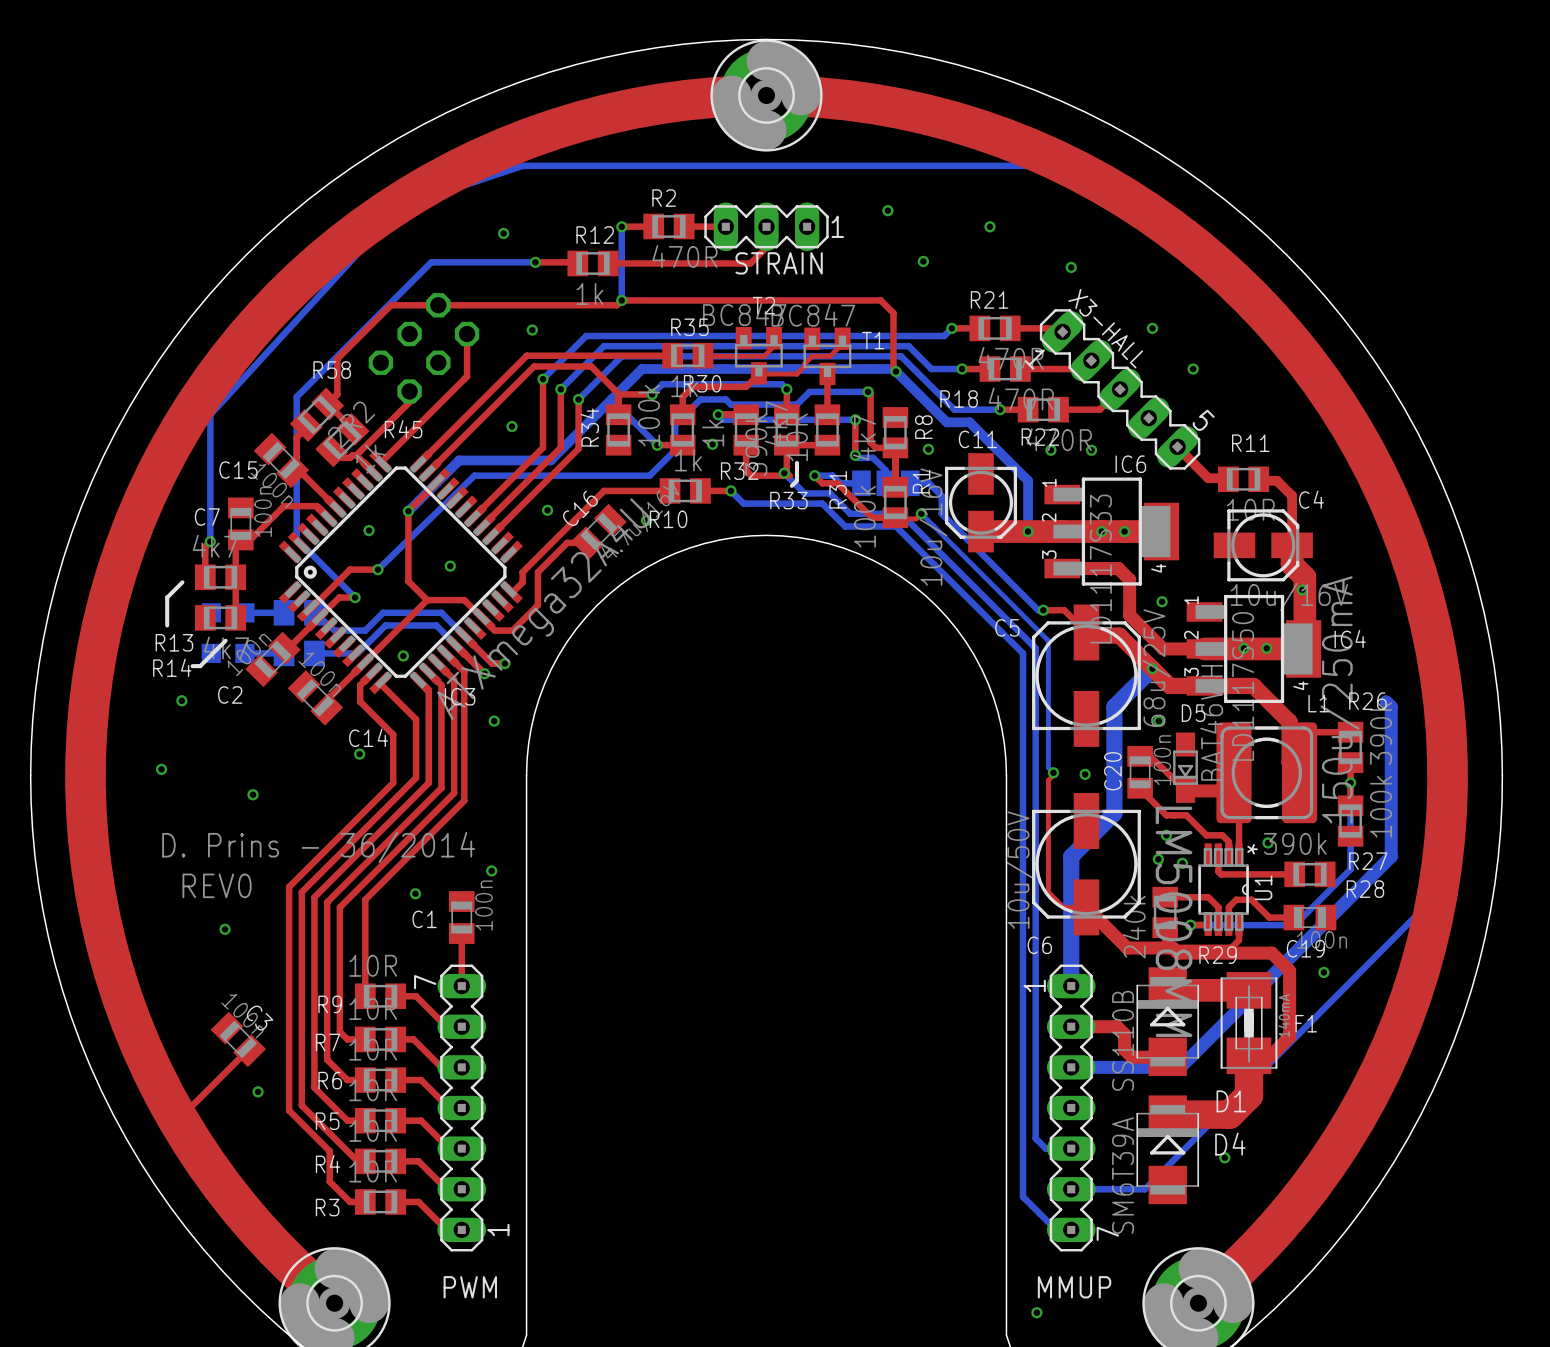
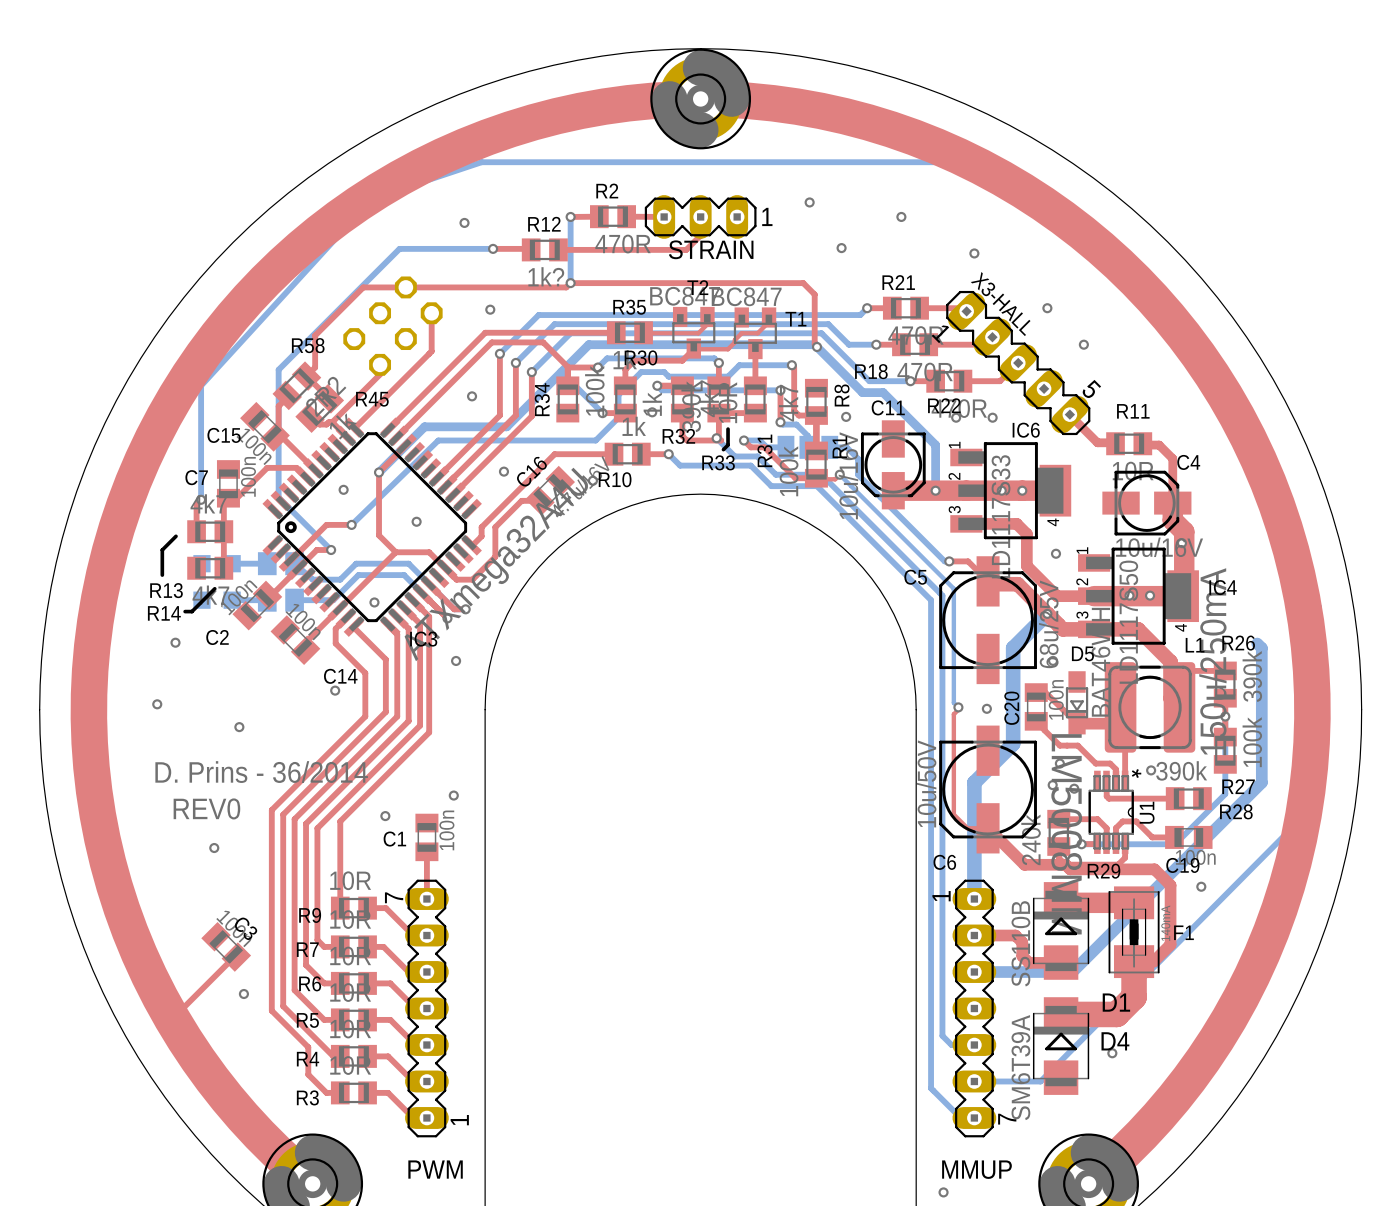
R12 value: 1k (589, 293) -> 1k? (546, 276)

